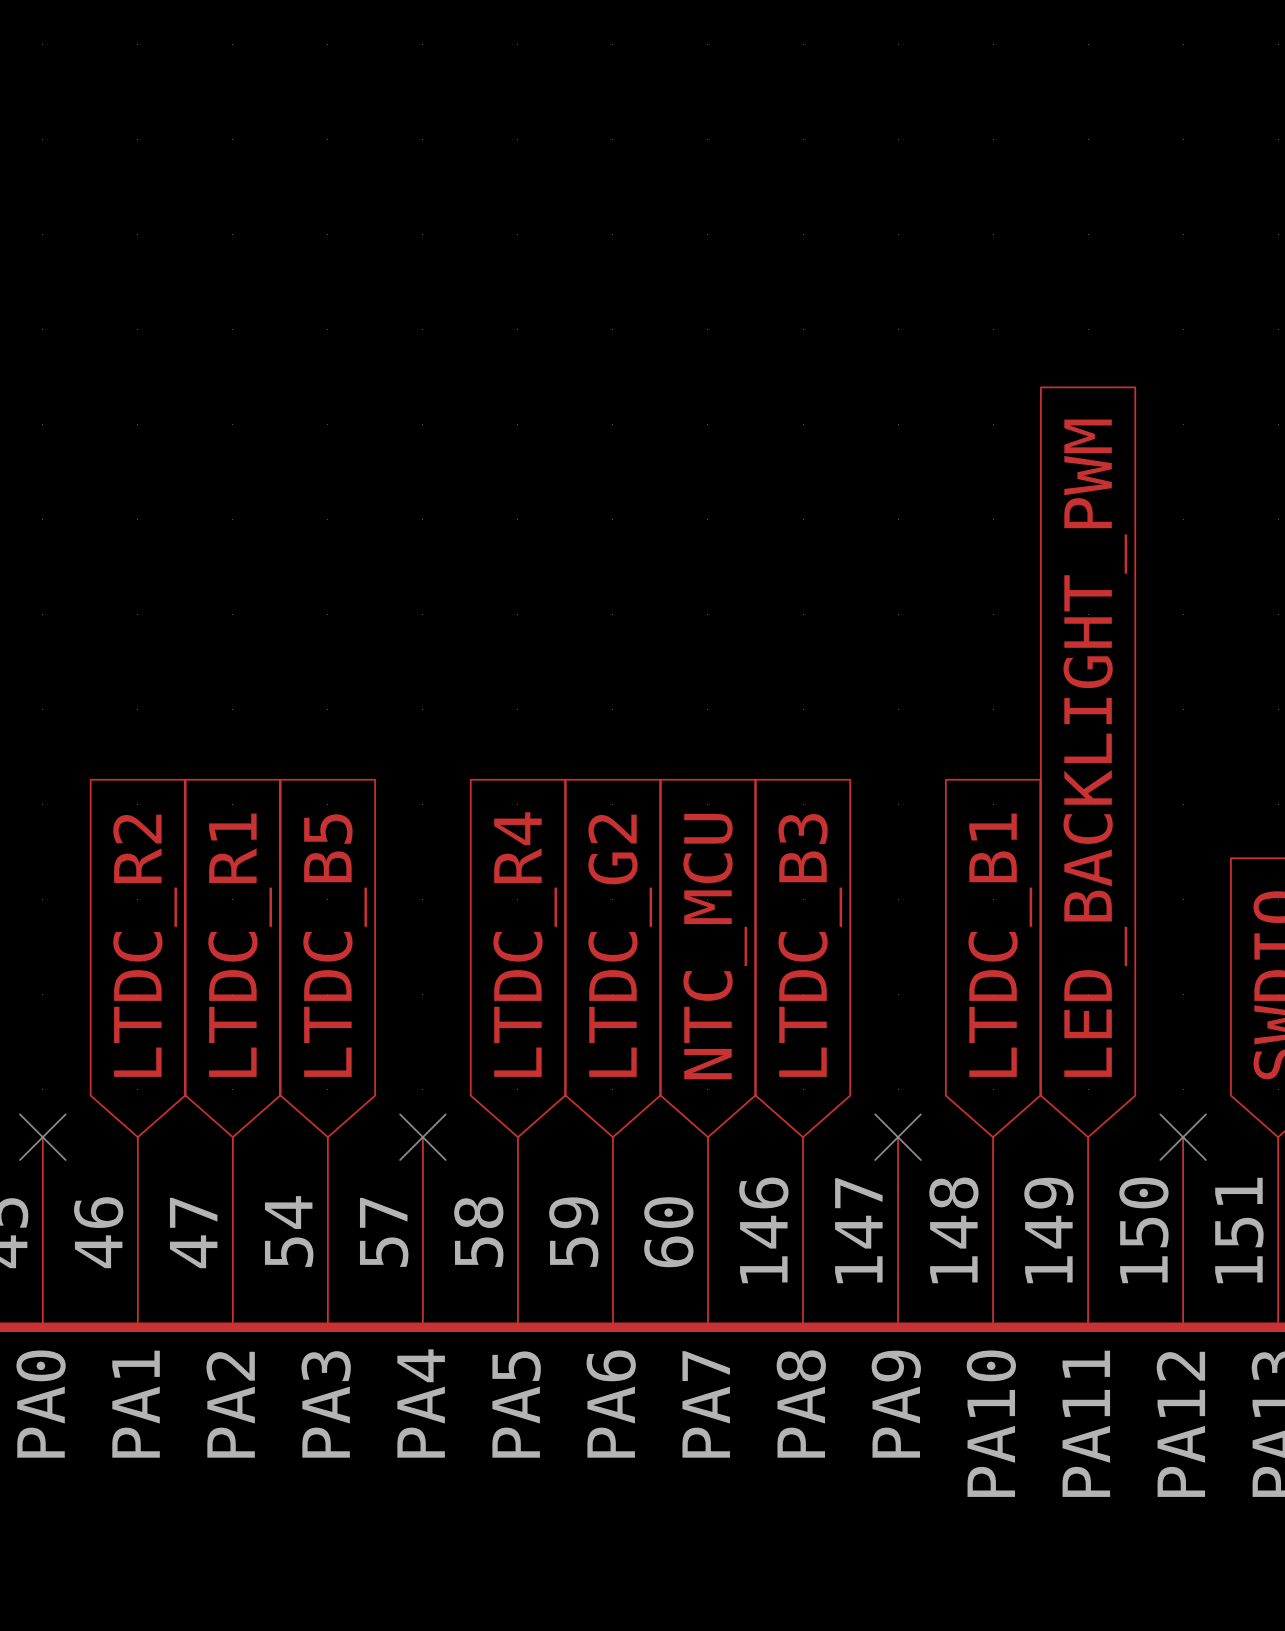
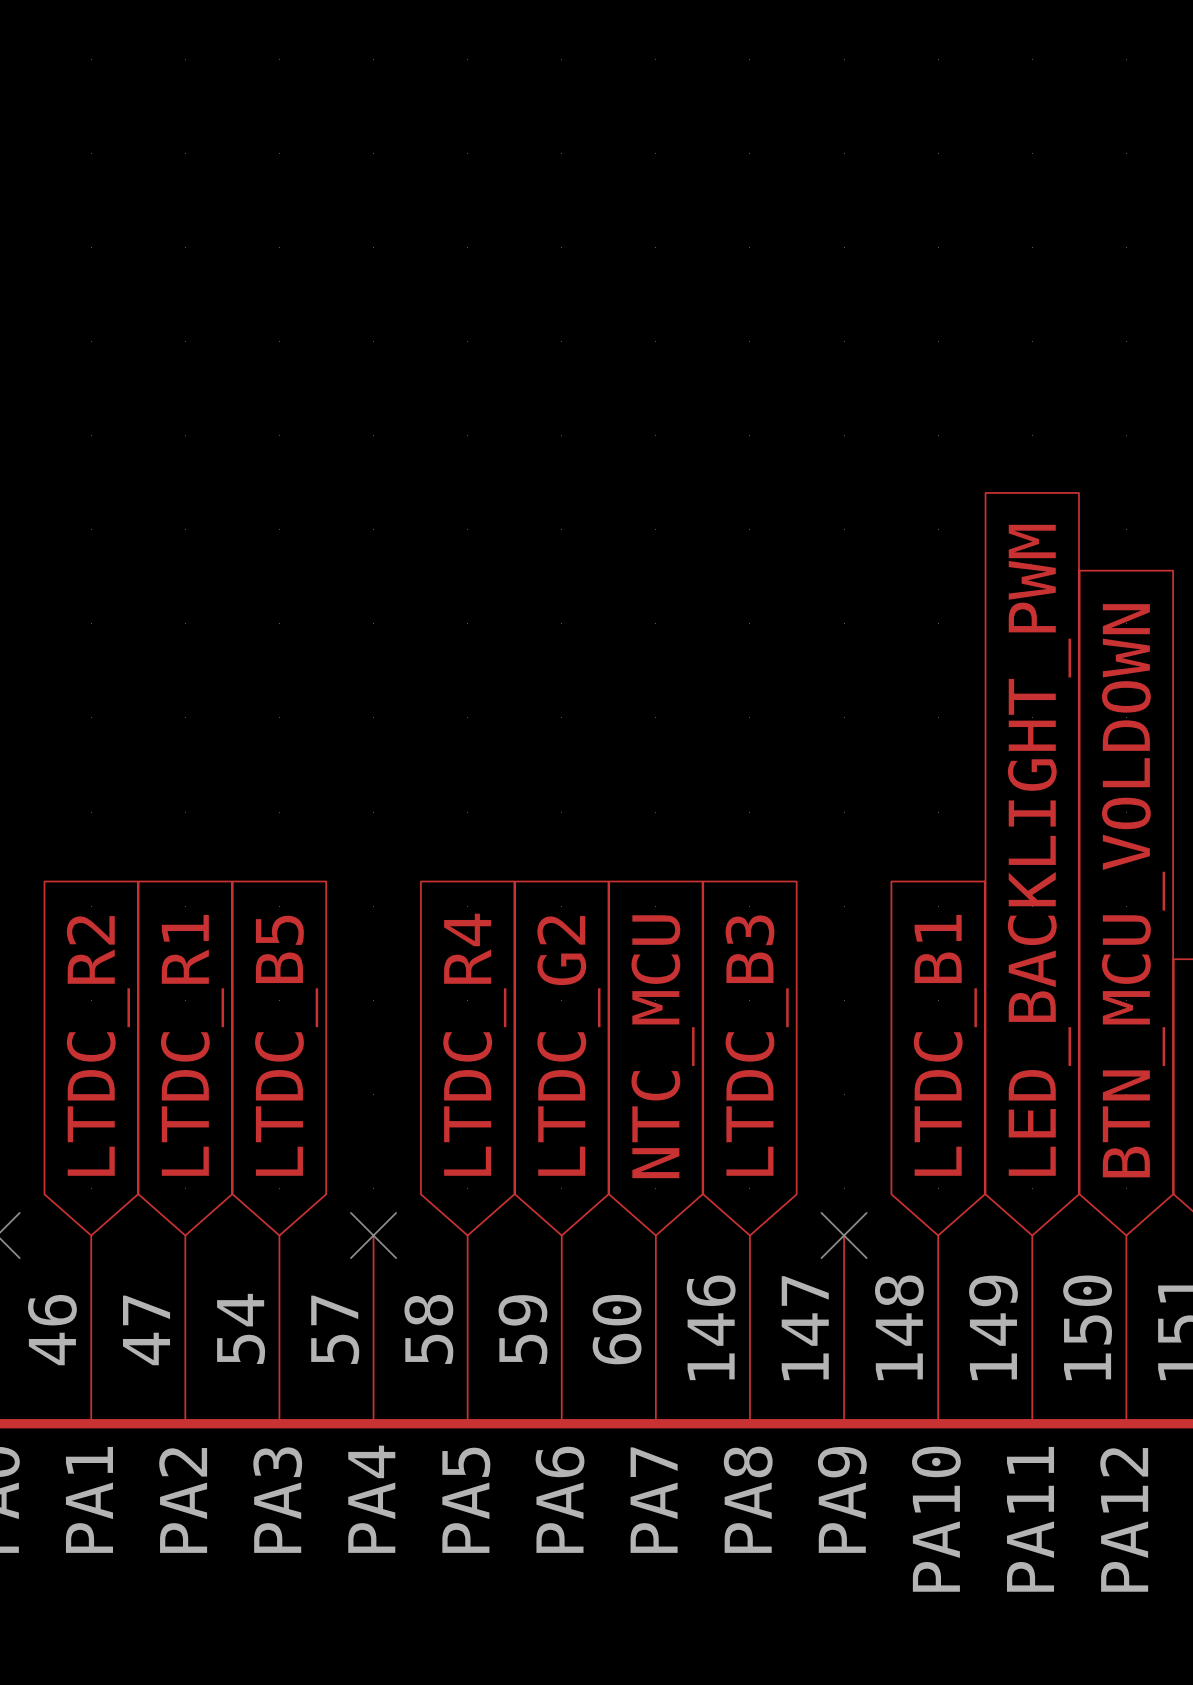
global label: none -> BTN_MCU_VOLDOWN (1133, 890)
no-connect mark: (1183, 1137) -> none

